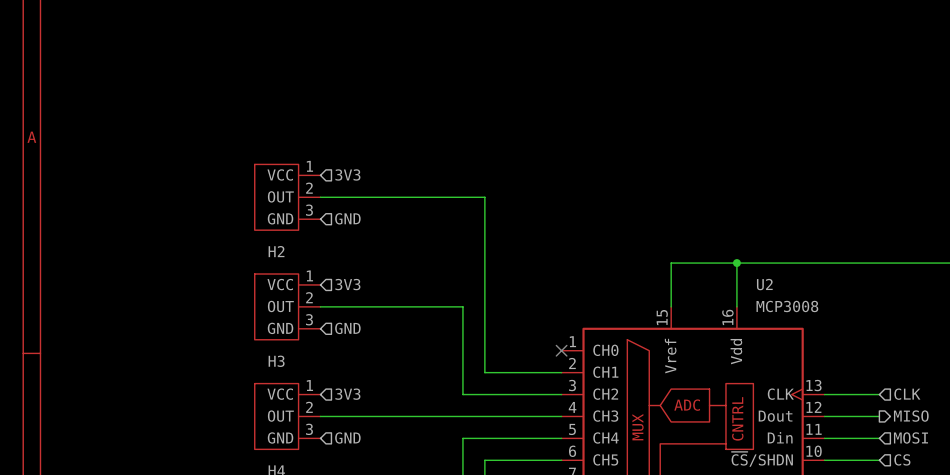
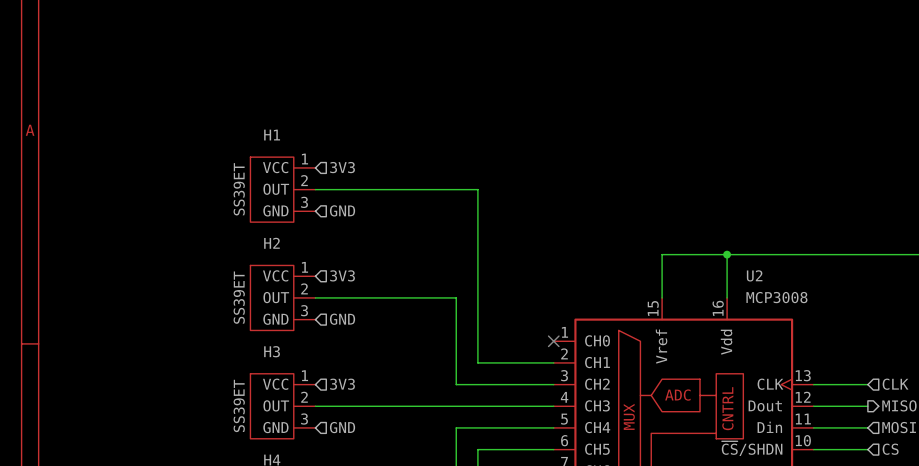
H1 name: none -> H1 (272, 135)
H1 value: none -> SS39ET (239, 189)
H2 value: none -> SS39ET (239, 297)
H3 value: none -> SS39ET (239, 405)

